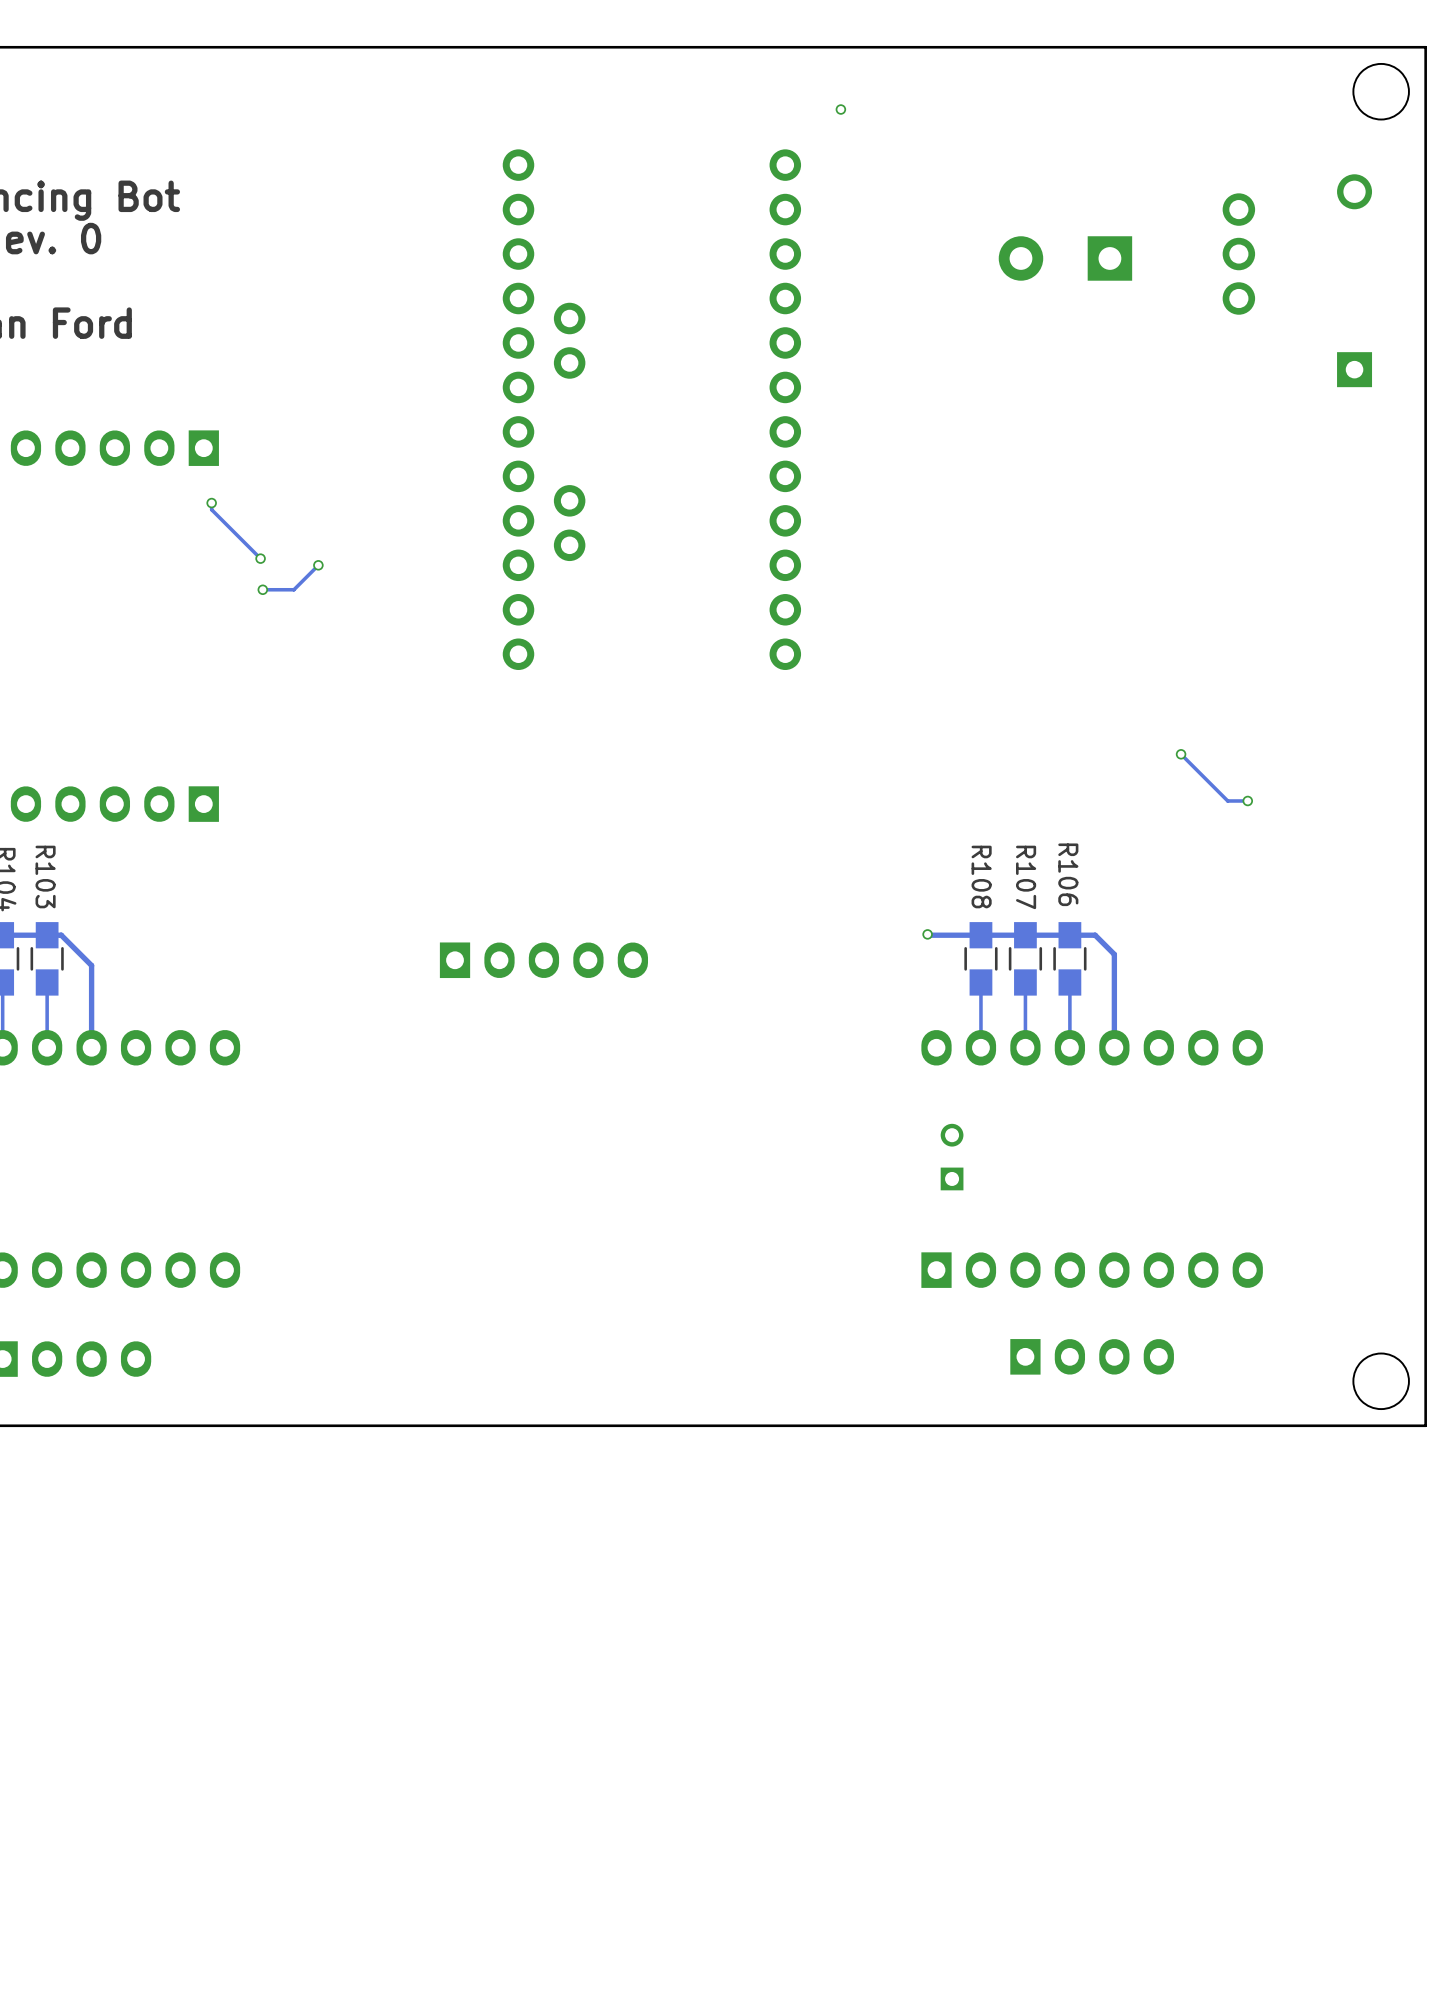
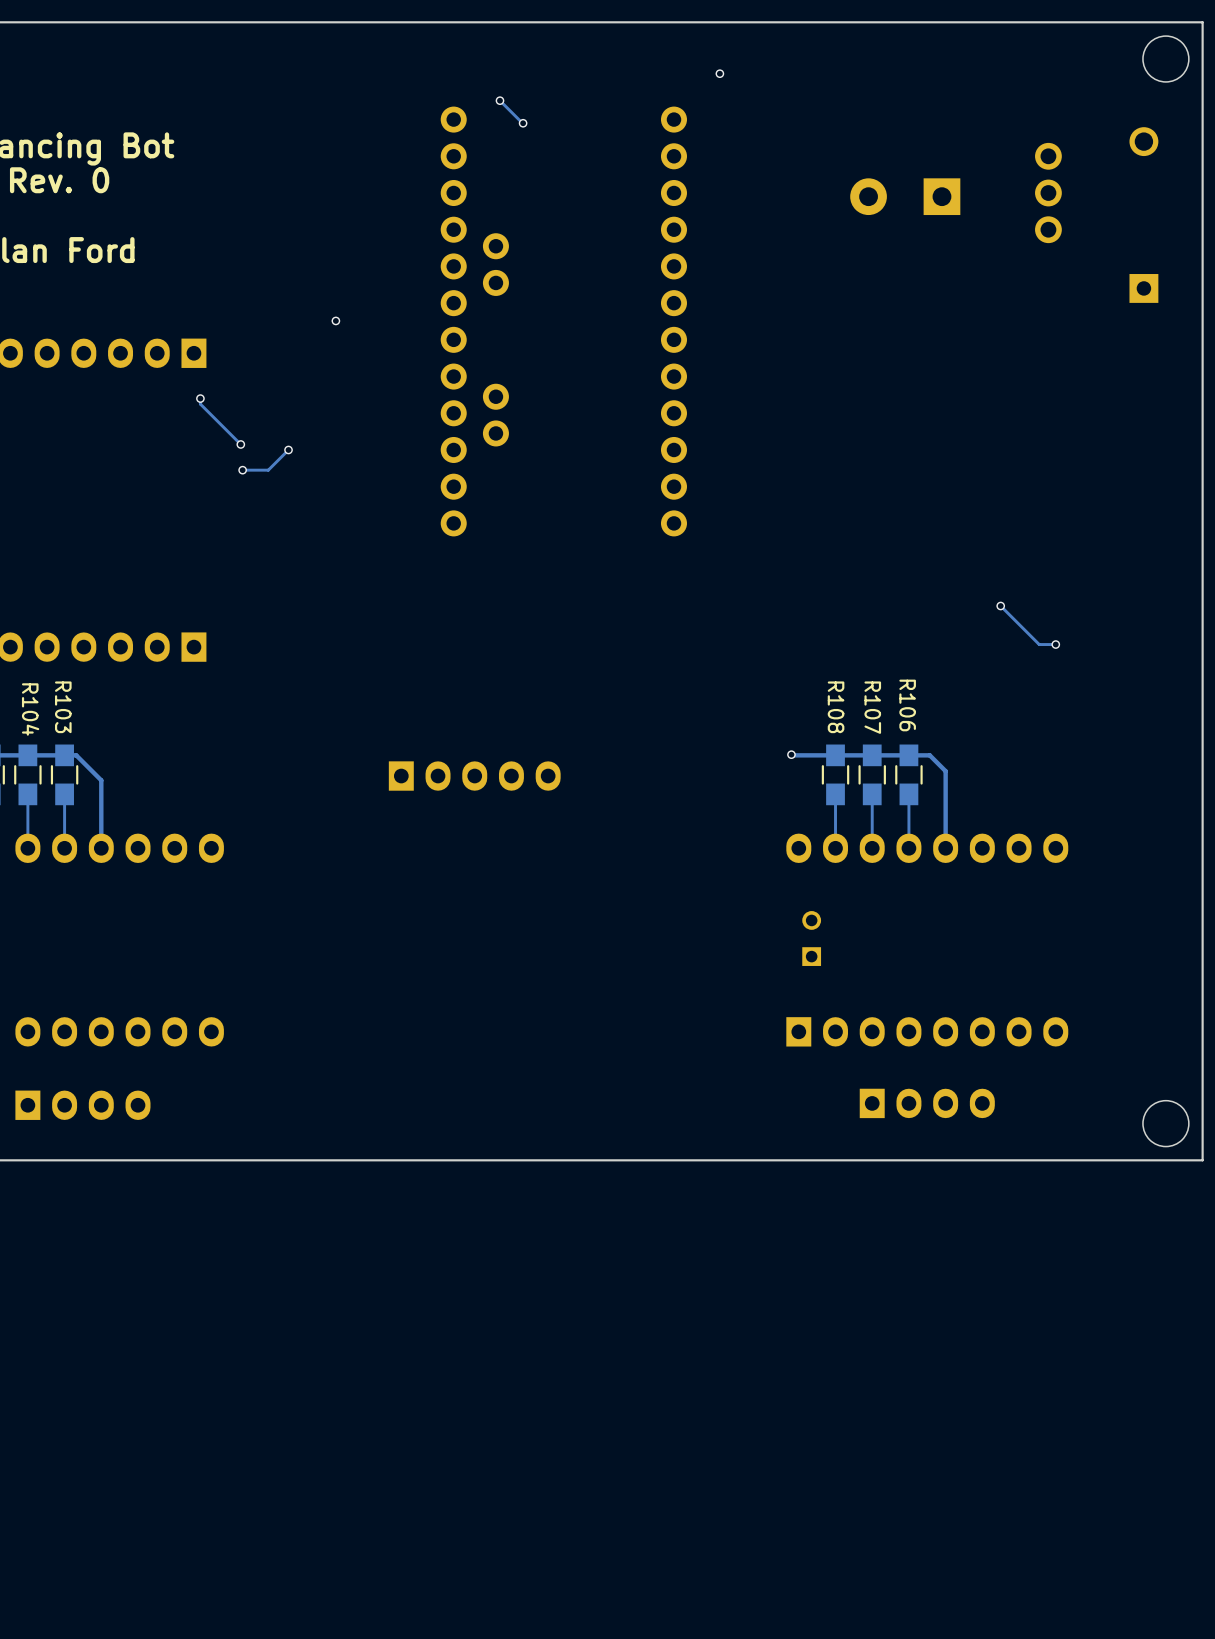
track: none -> (499, 100) (523, 123)
via: none -> (499, 100)
via: none -> (523, 123)
via: none -> (335, 320)

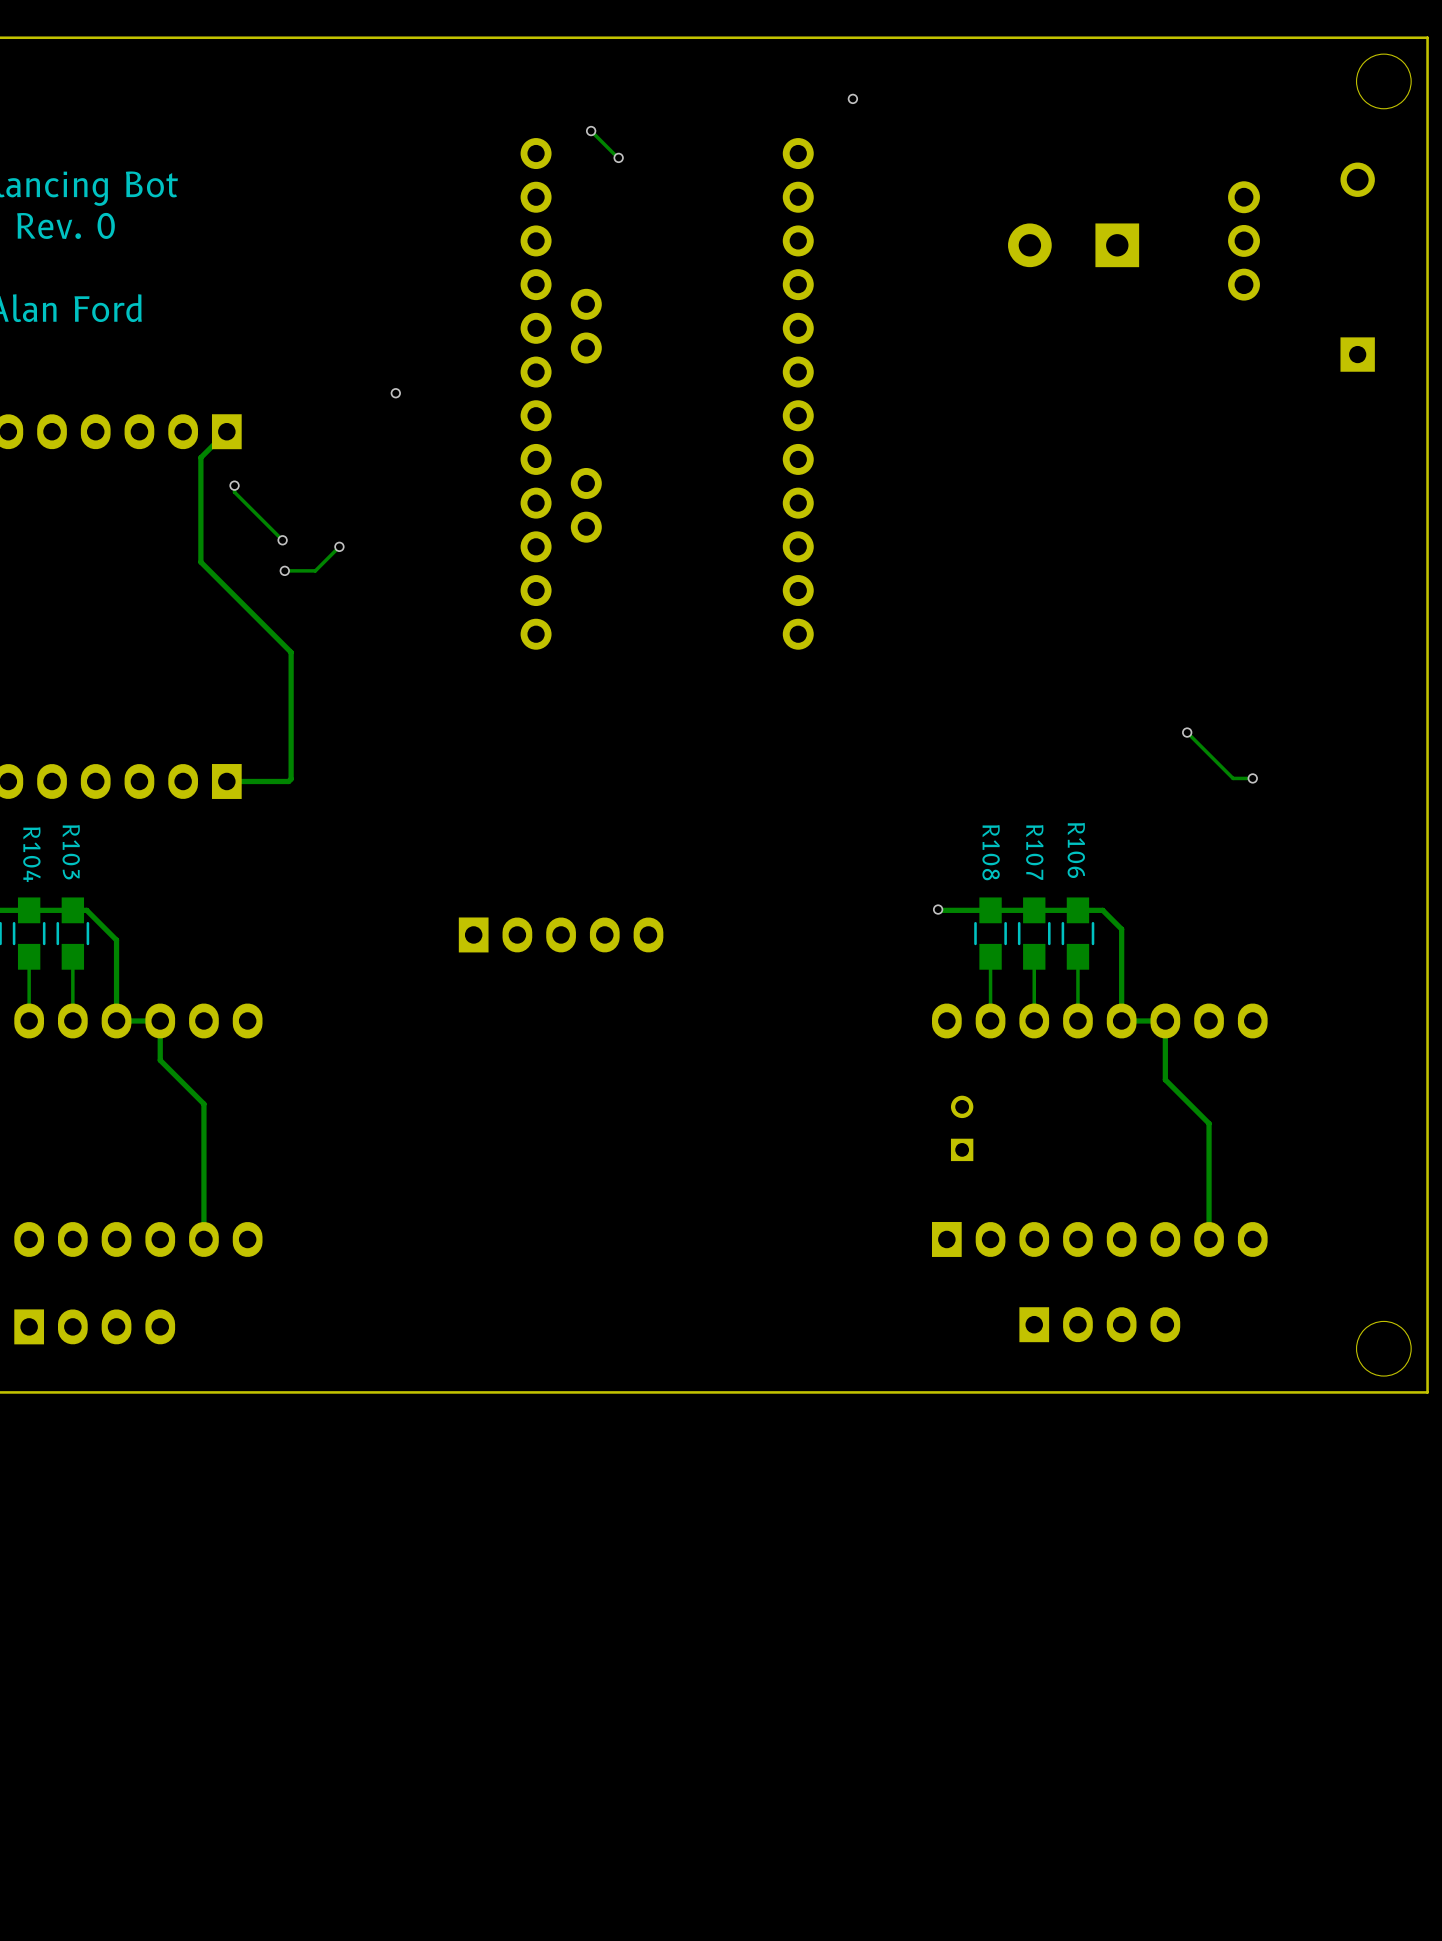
track: none -> (226, 431) (200, 457) (200, 562) (291, 652) (291, 779) (288, 781) (226, 781)
track: none -> (116, 1020) (160, 1020) (160, 1060) (203, 1104) (203, 1239)
track: none -> (1121, 1020) (1165, 1020) (1165, 1079) (1209, 1123) (1209, 1239)

